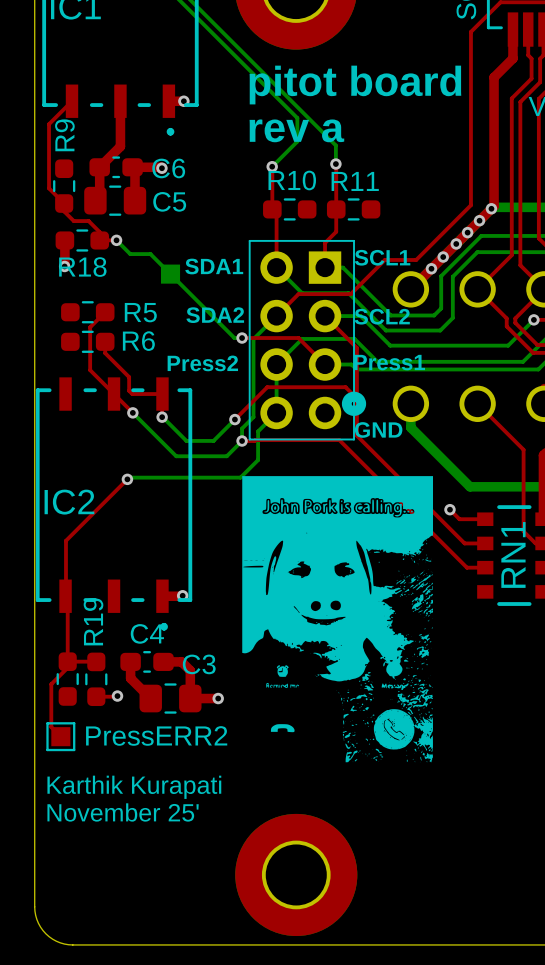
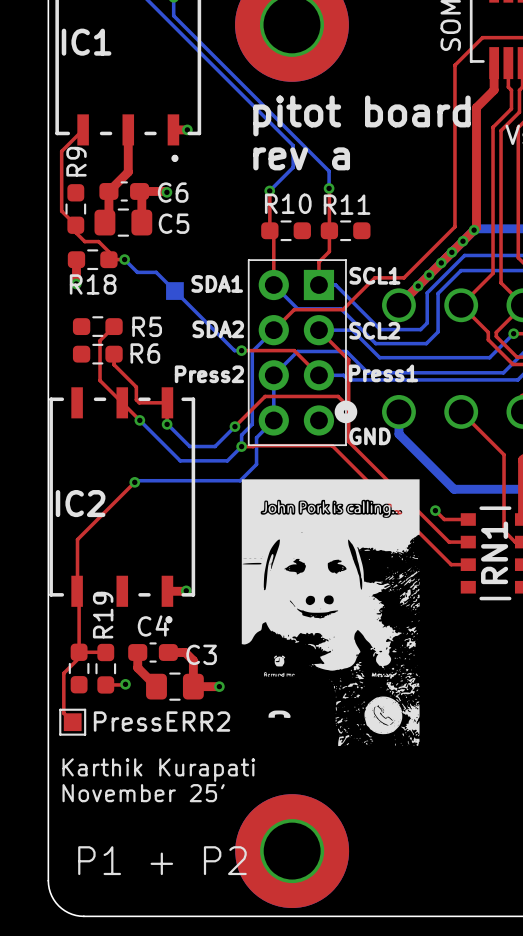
text: none -> P1 + P2 (162, 860)

